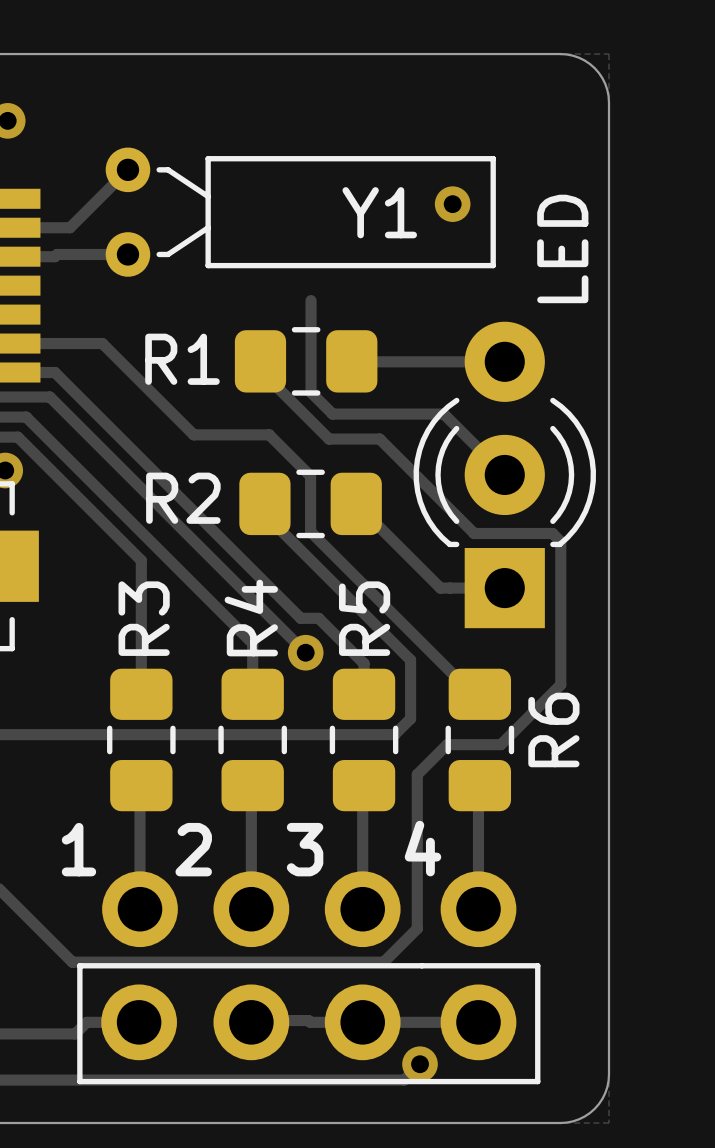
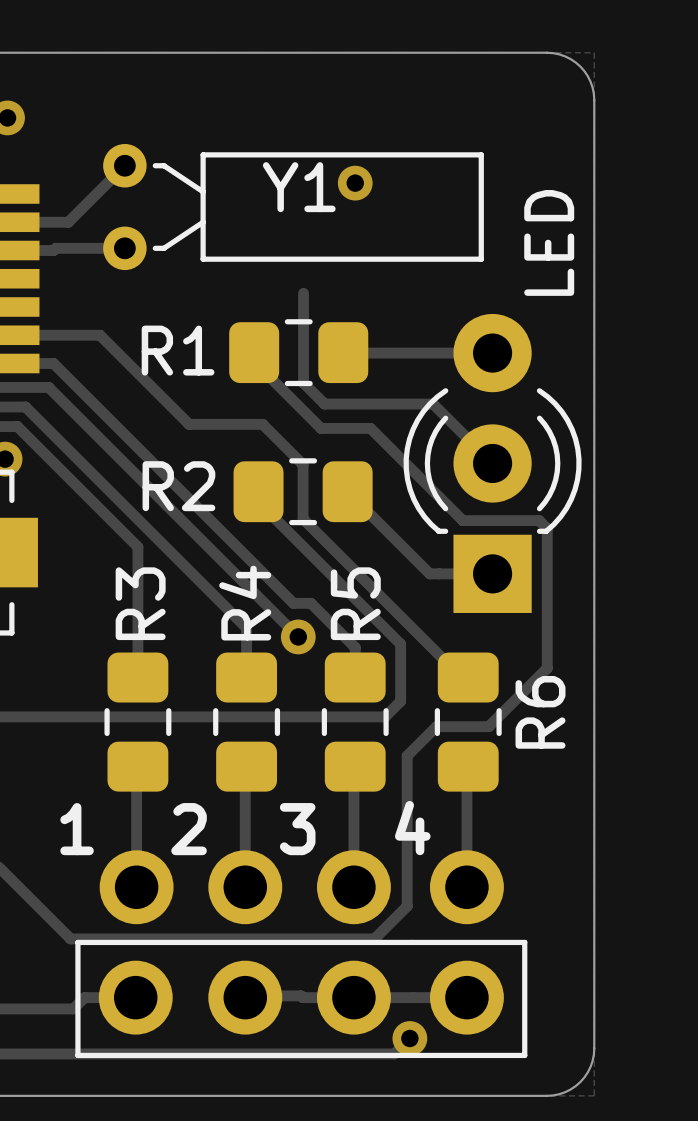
via position: (452, 204) -> (355, 183)
Y1 name position: Y1 (379, 212) -> Y1 (299, 187)

